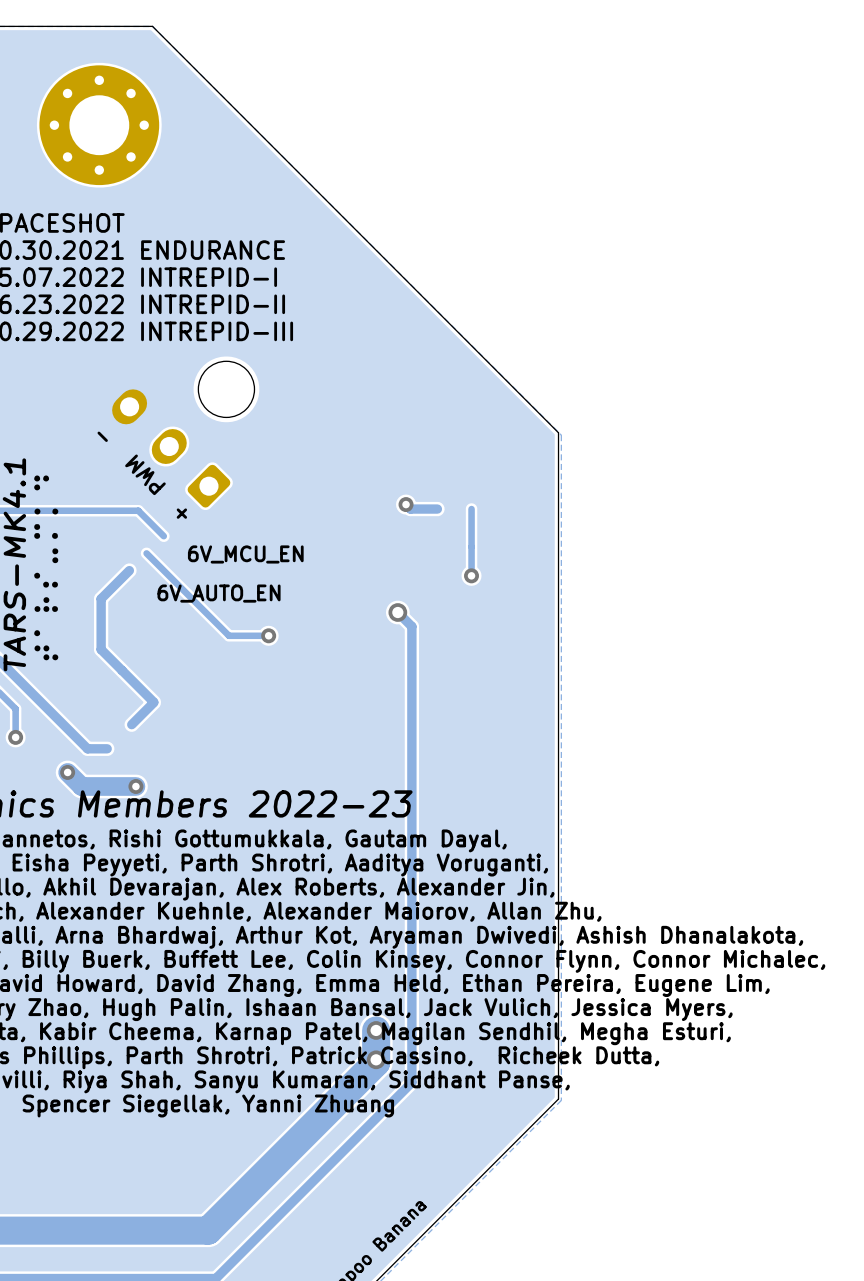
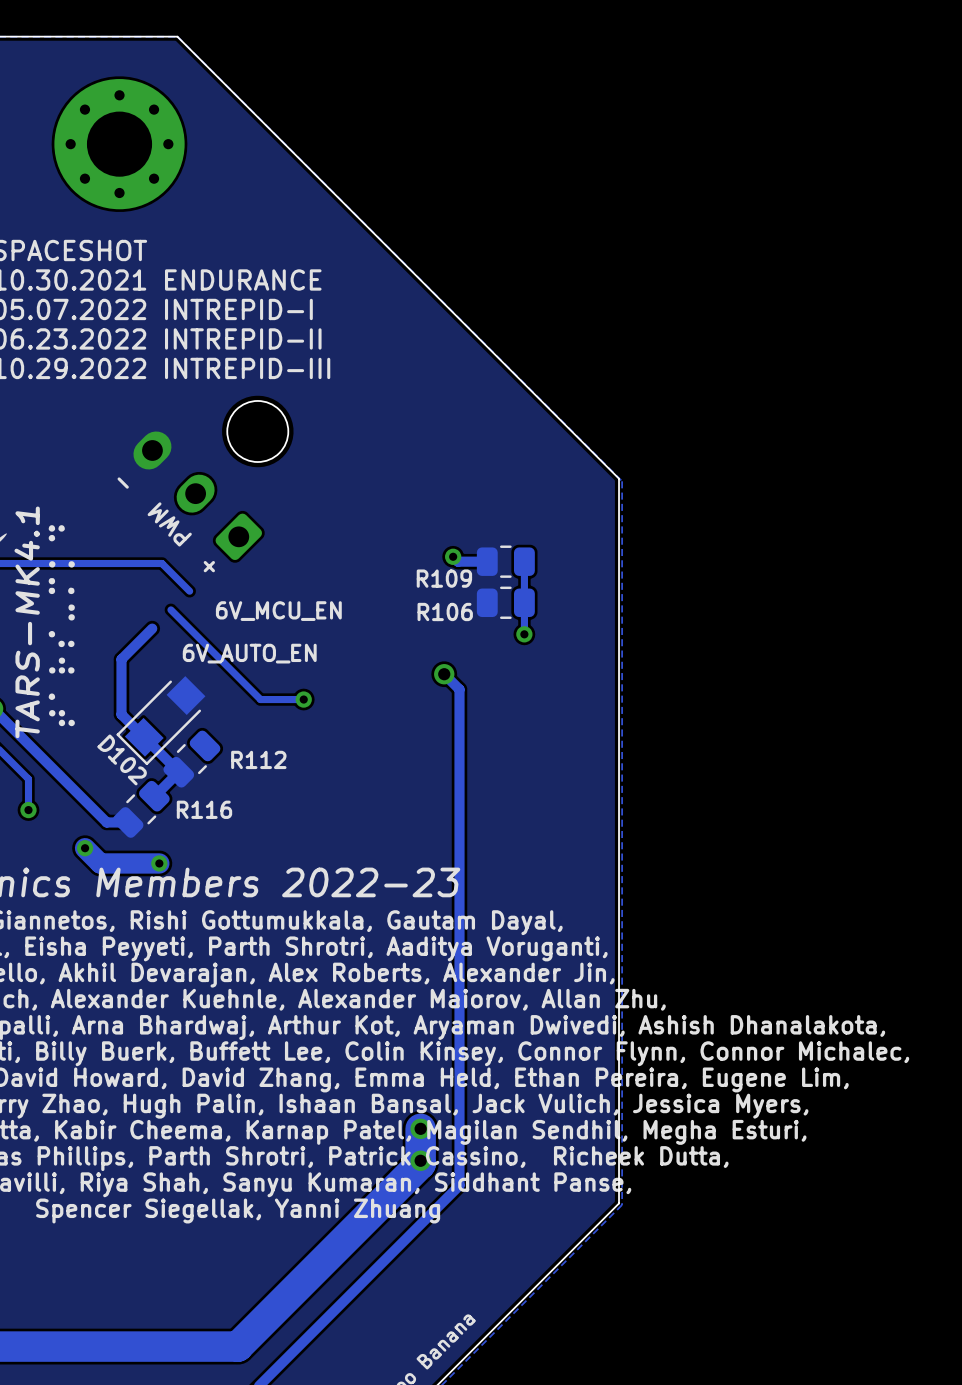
R109: none -> (505, 561)
R106: none -> (505, 602)
D102: none -> (161, 720)
R112: none -> (191, 759)
R116: none -> (141, 809)

